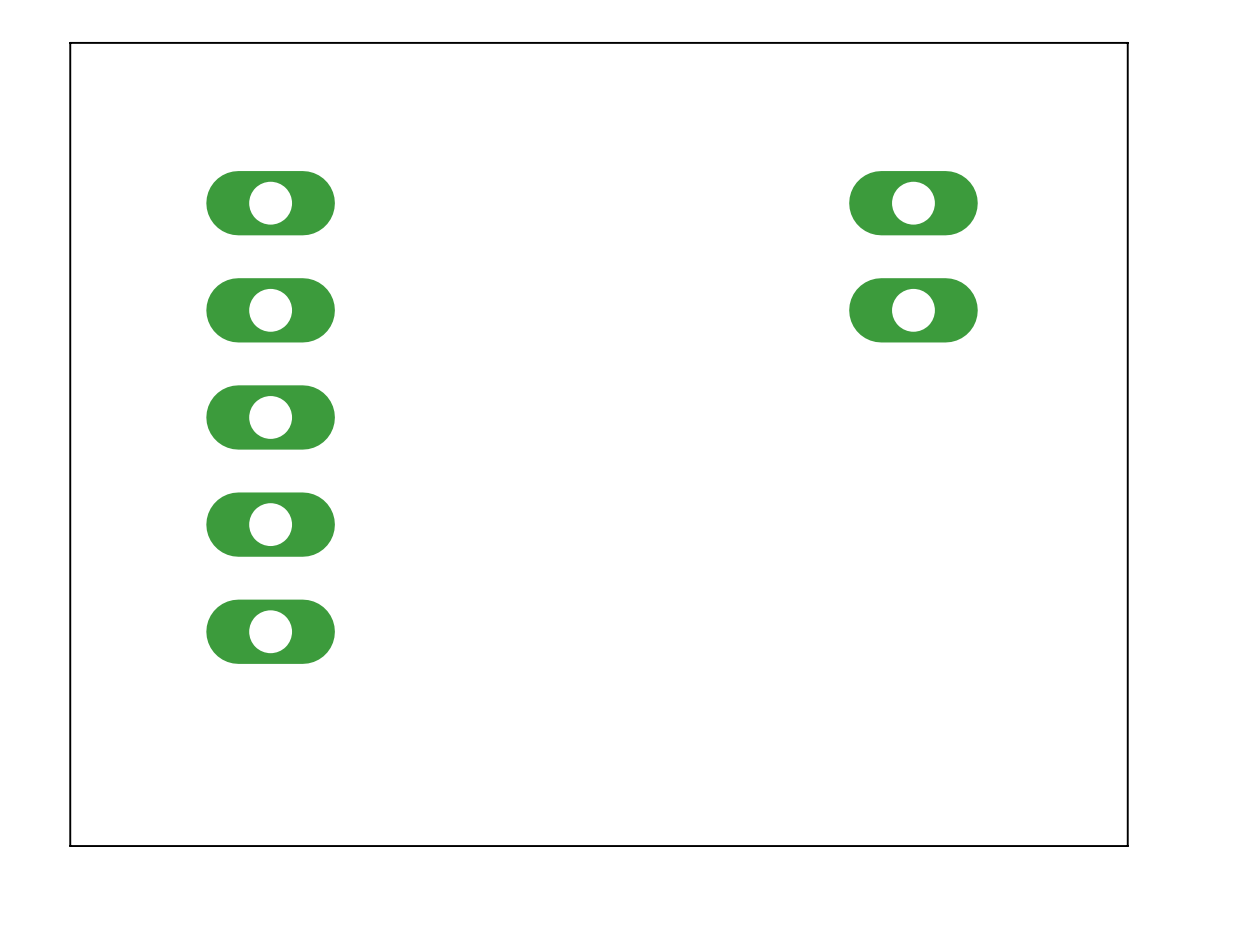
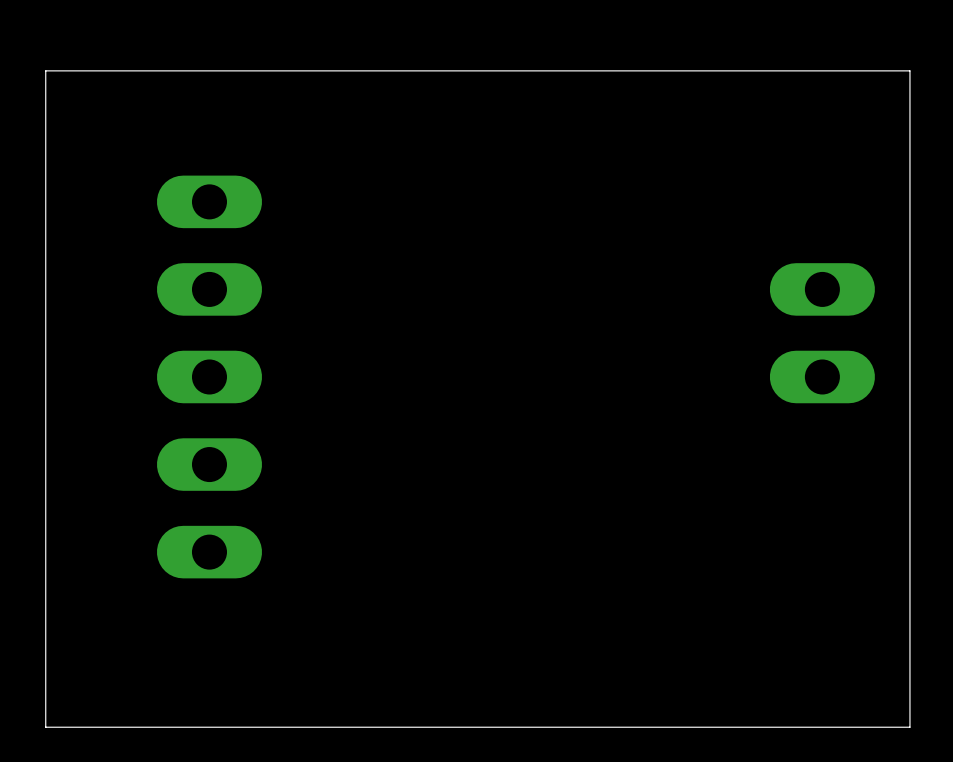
part position: (913, 256) -> (822, 333)

